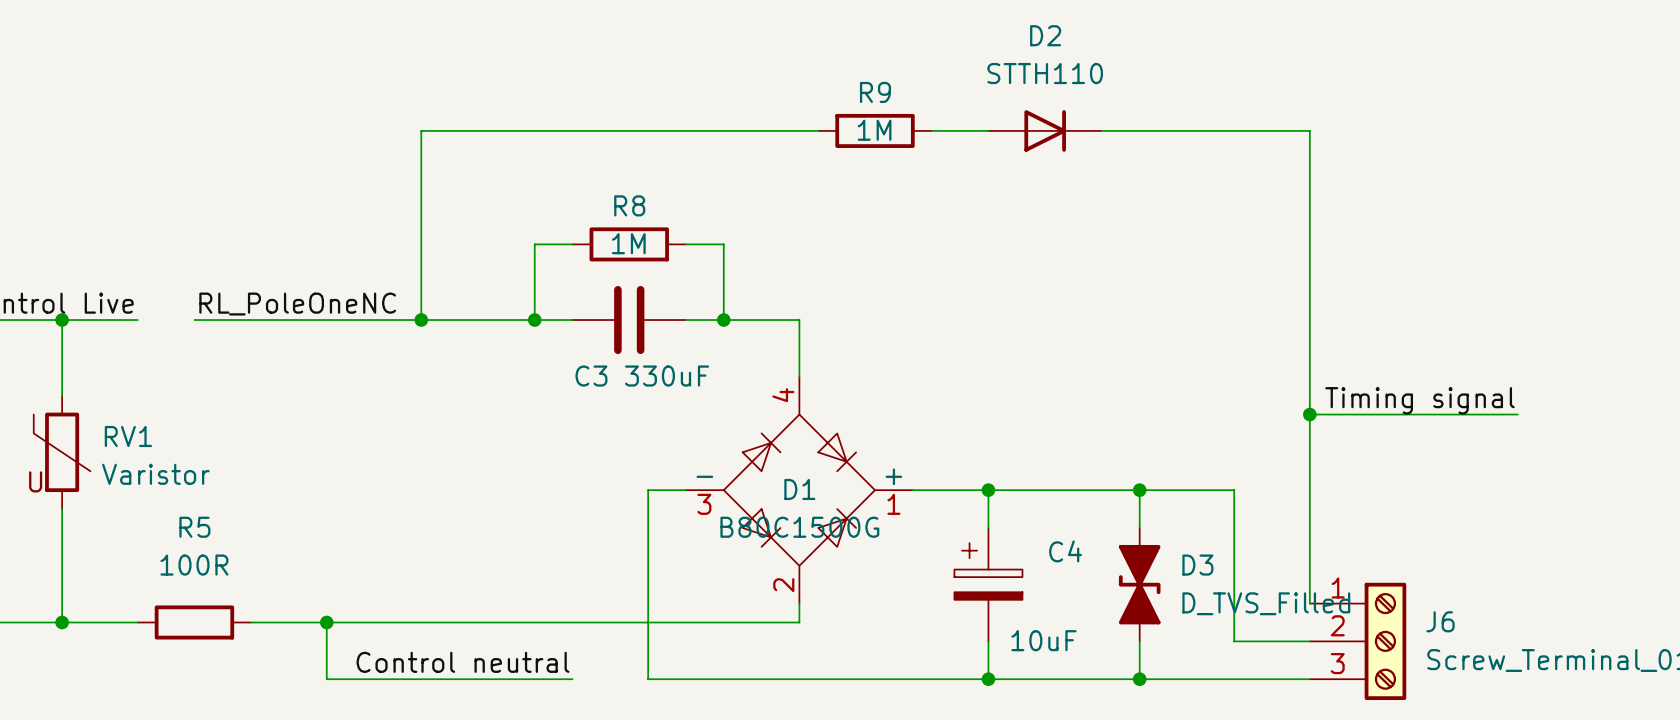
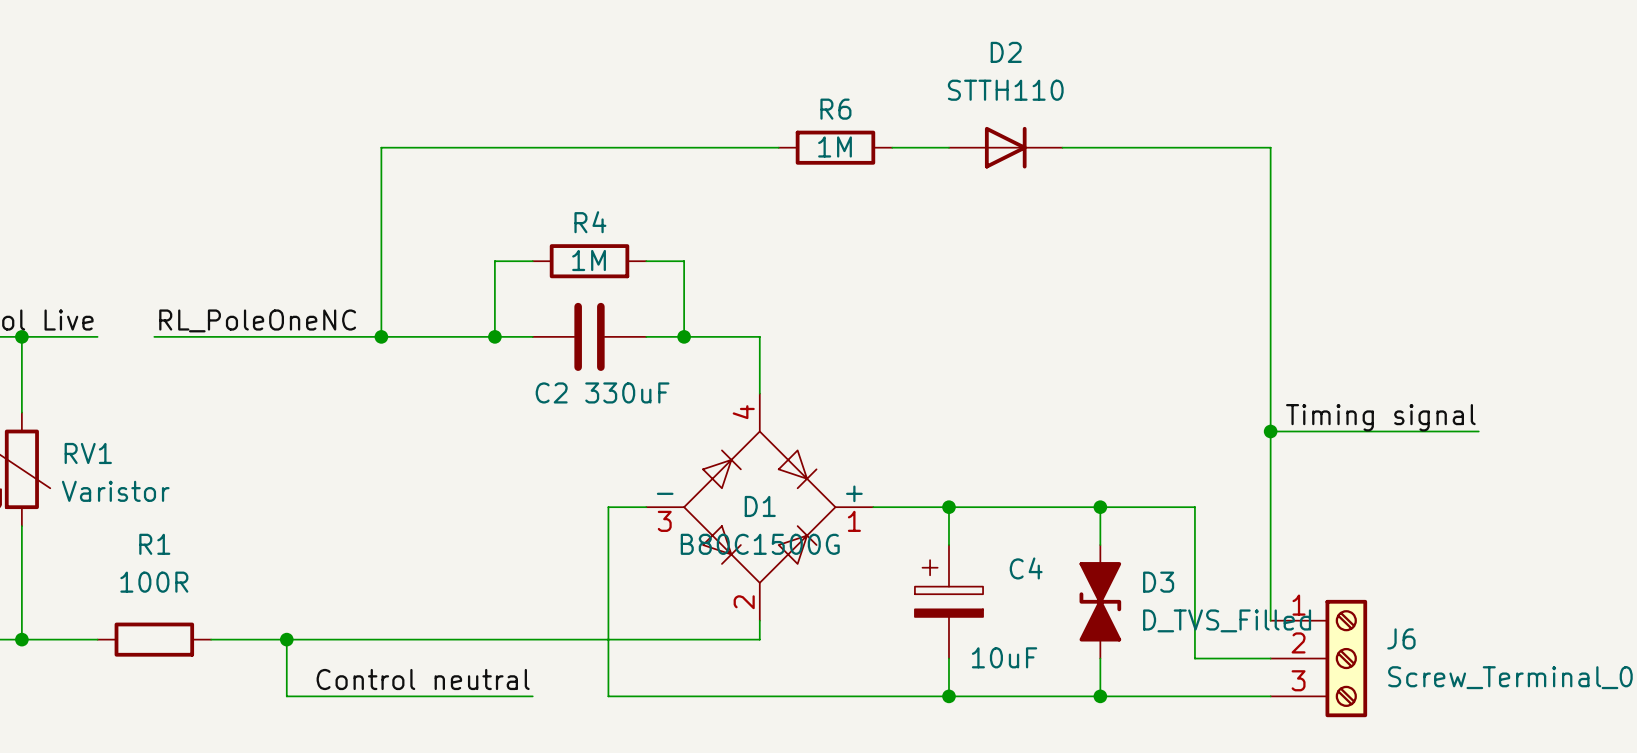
R9 name: R9 (875, 92) -> R6 (835, 109)
R8 name: R8 (629, 205) -> R4 (590, 222)
C3 name: C3 (591, 376) -> C2 (551, 392)
R5 name: R5 (194, 527) -> R1 (154, 544)

